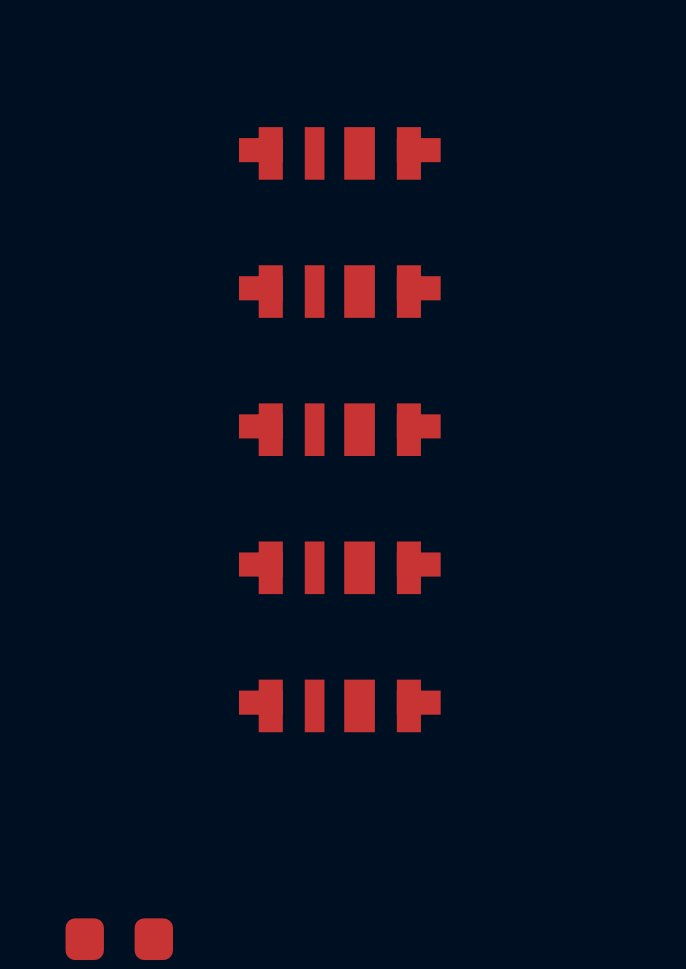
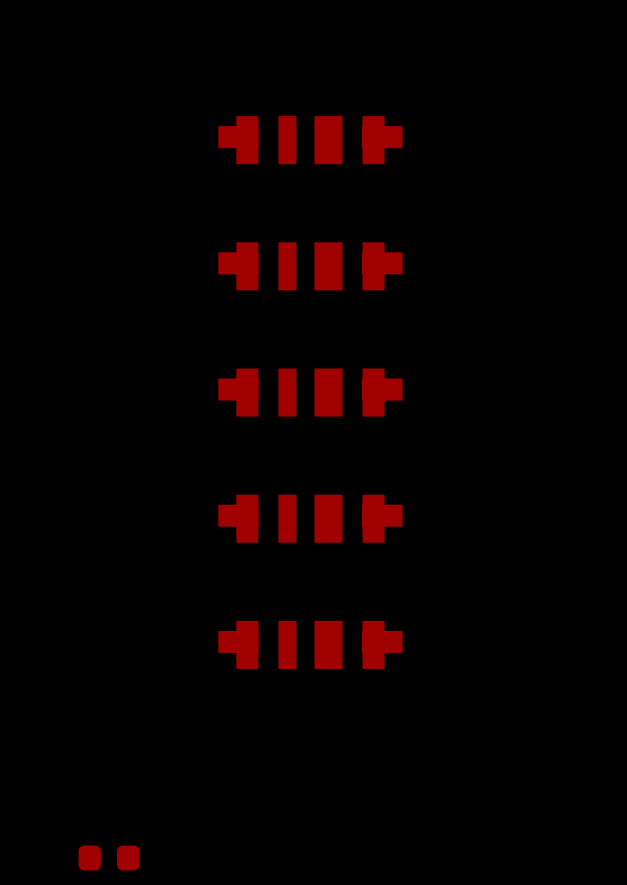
part footprint: [65, 918, 173, 961] -> [78, 845, 140, 871]

